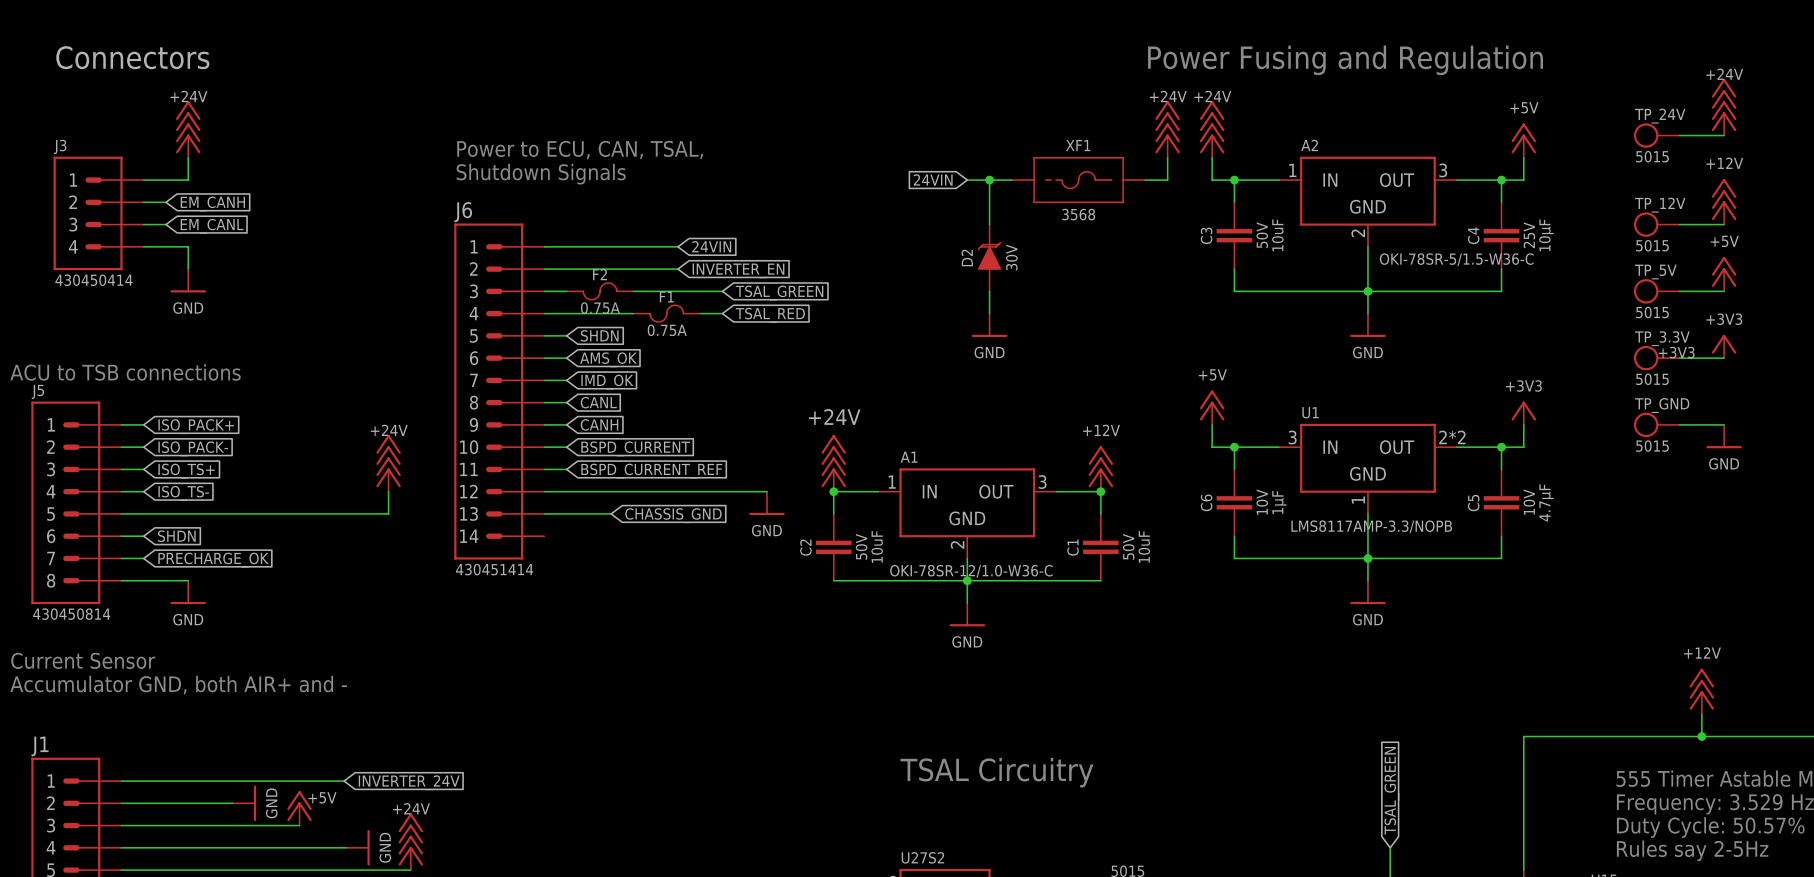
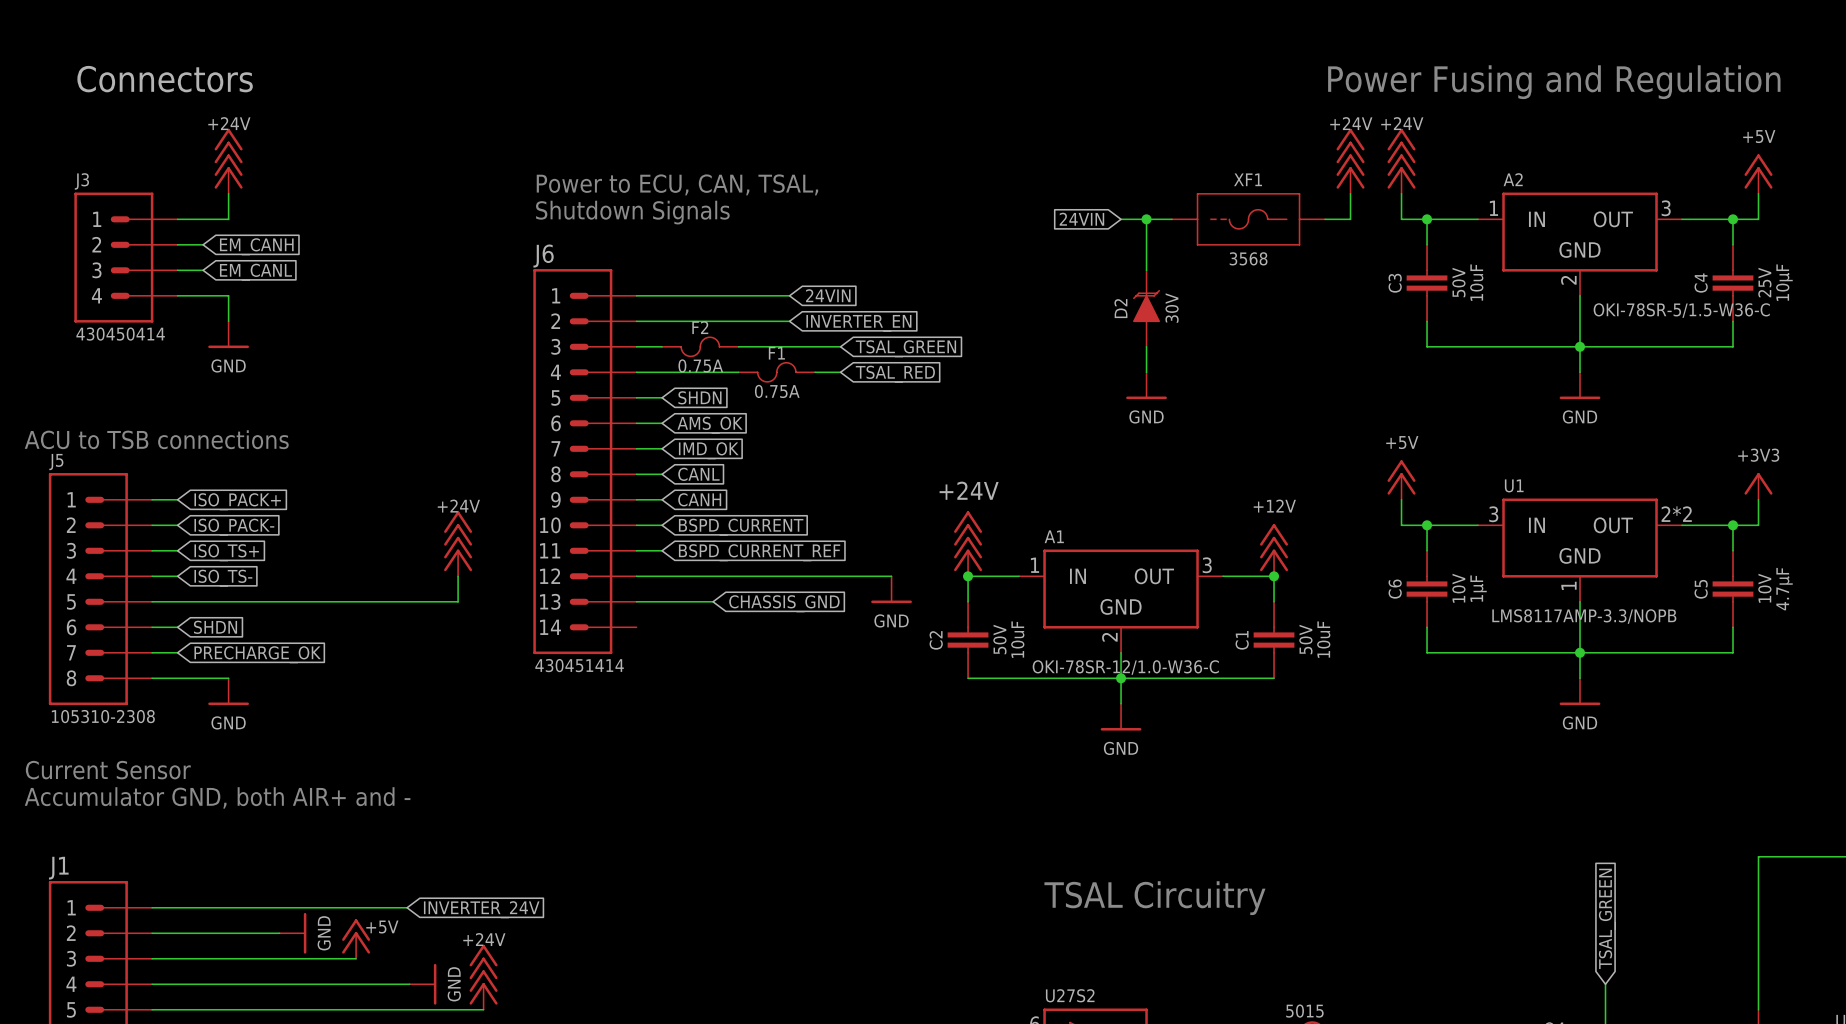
J5 text: 430450814 (71, 614) -> 105310-2308 (103, 716)

